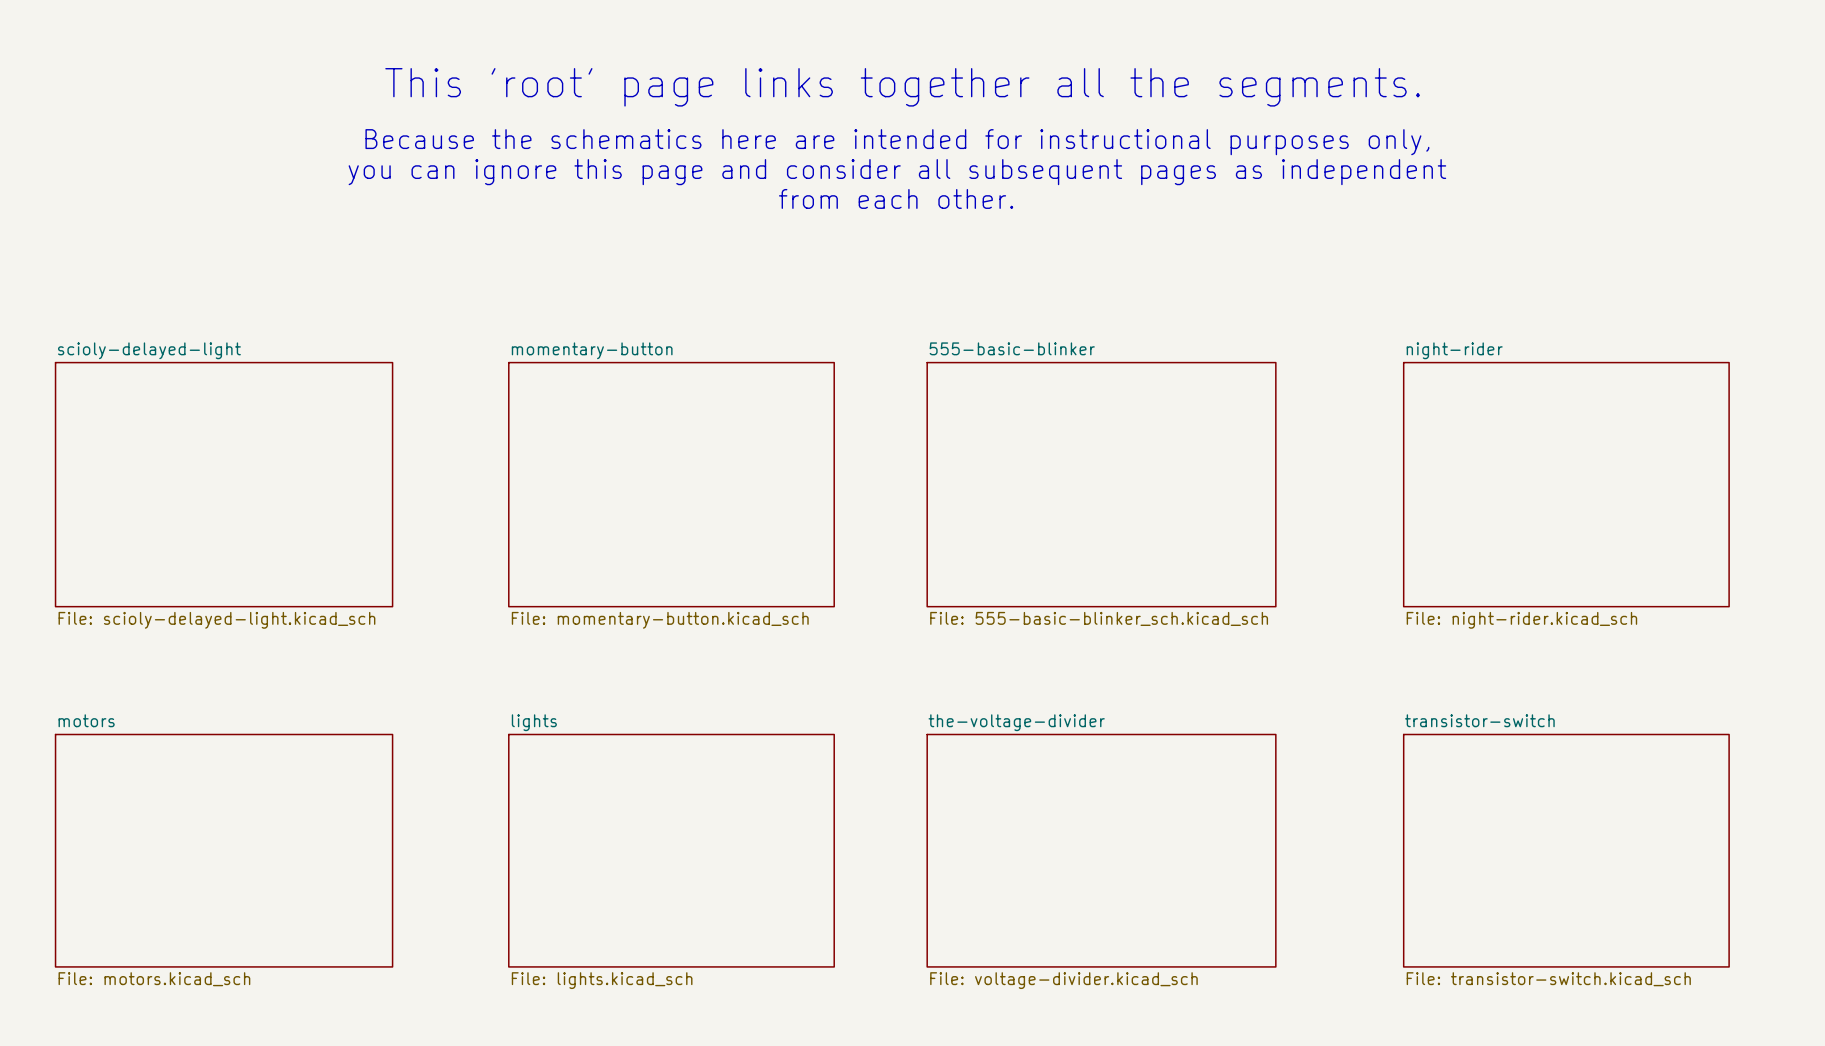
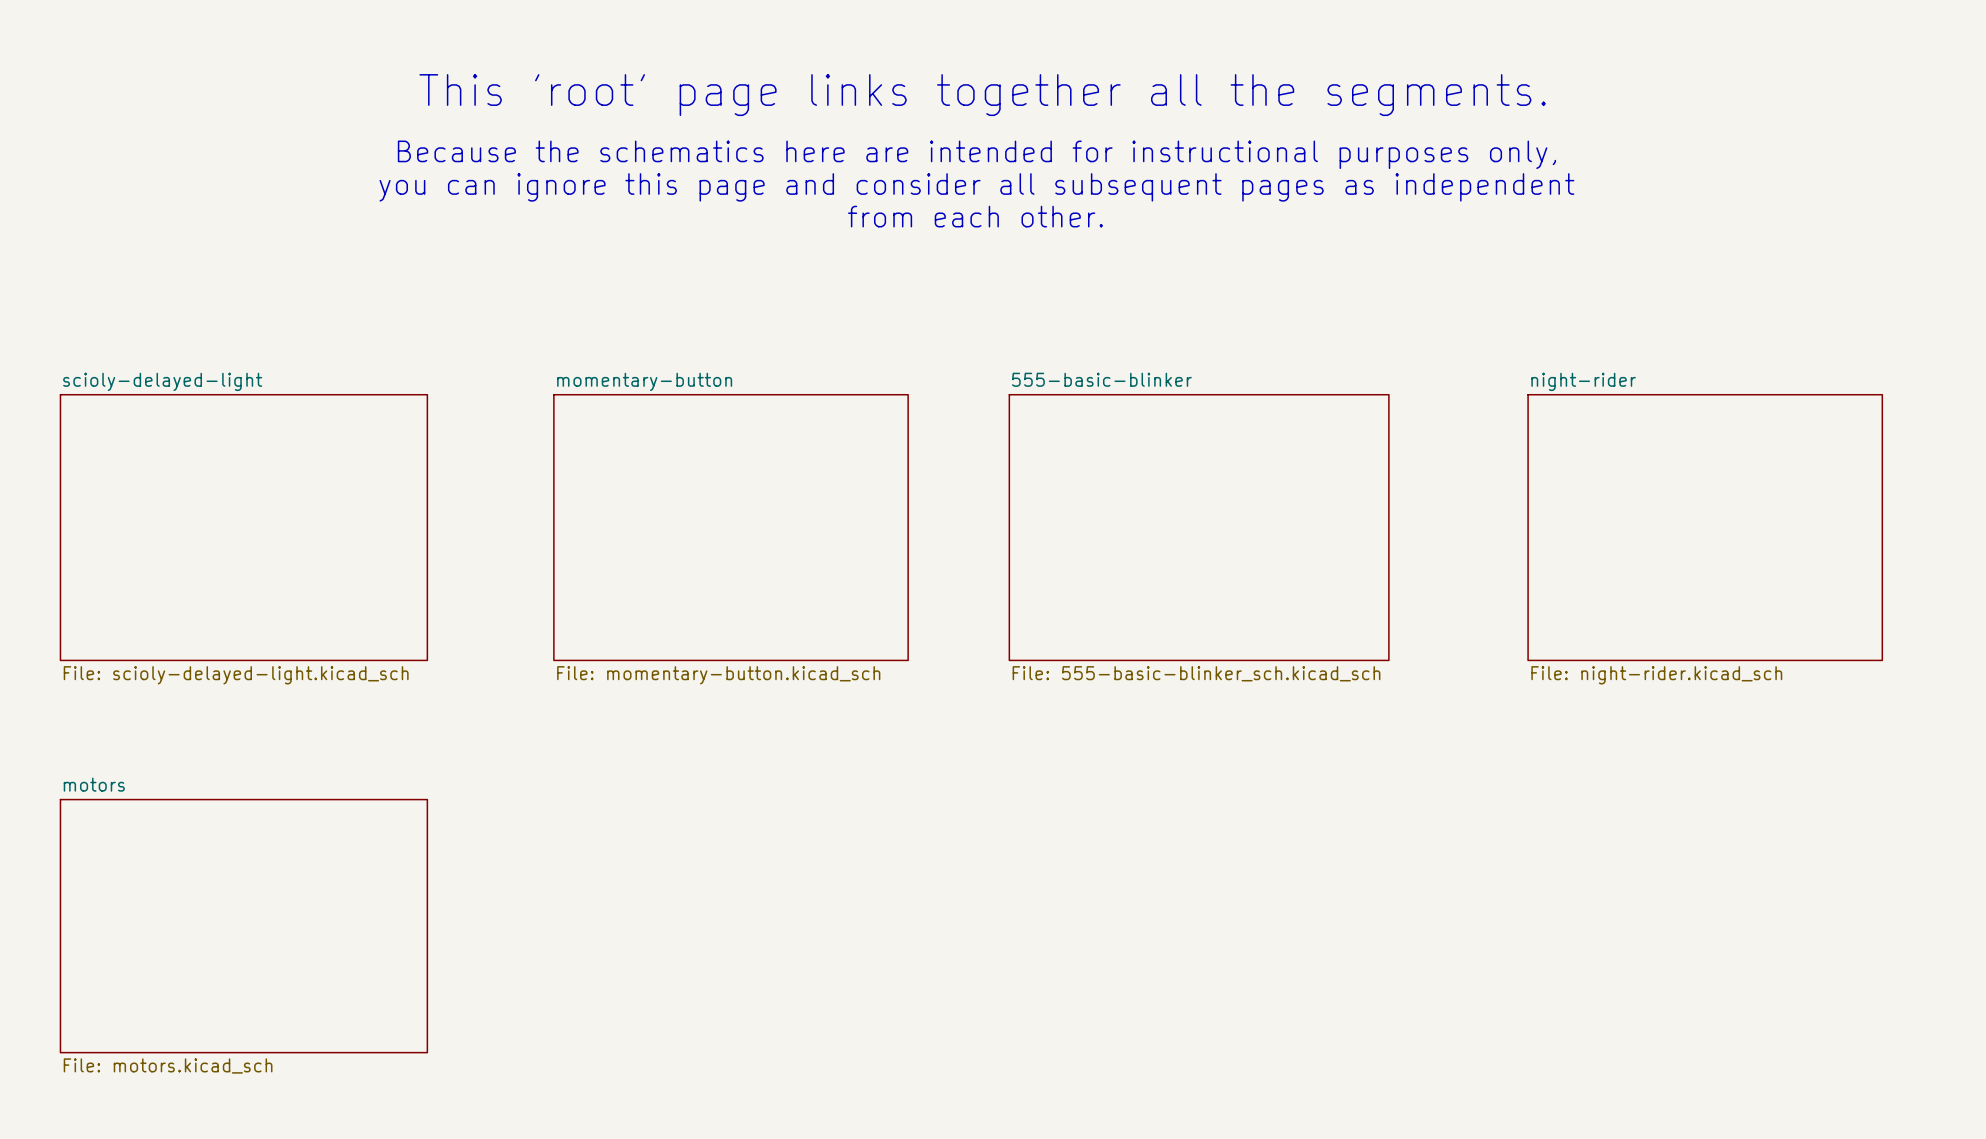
sheet lights: File: lights.kicad_sch (671, 850) -> none
sheet the-voltage-divider: File: voltage-divider.kicad_sch (1101, 850) -> none
sheet transistor-switch: File: transistor-switch.kicad_sch (1566, 850) -> none

